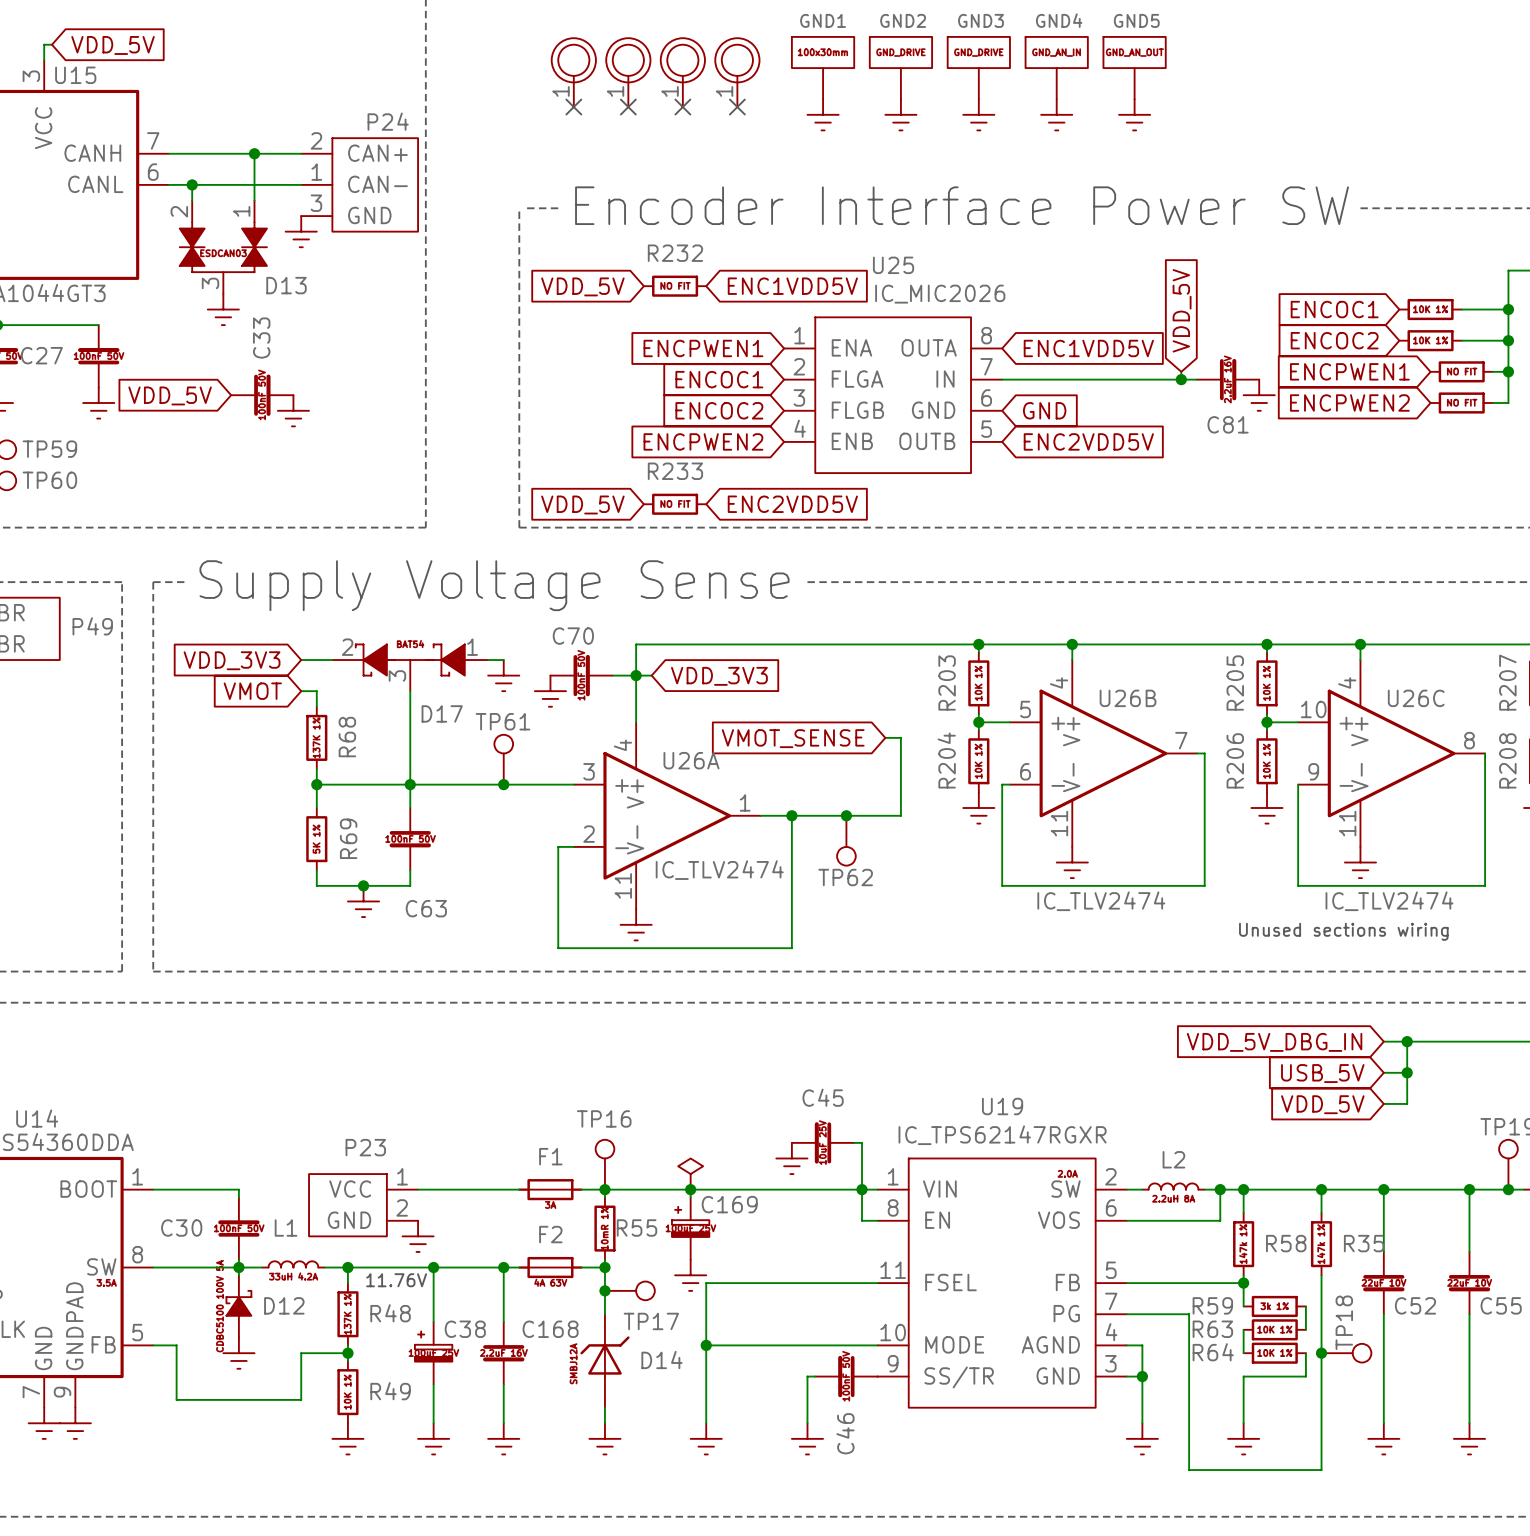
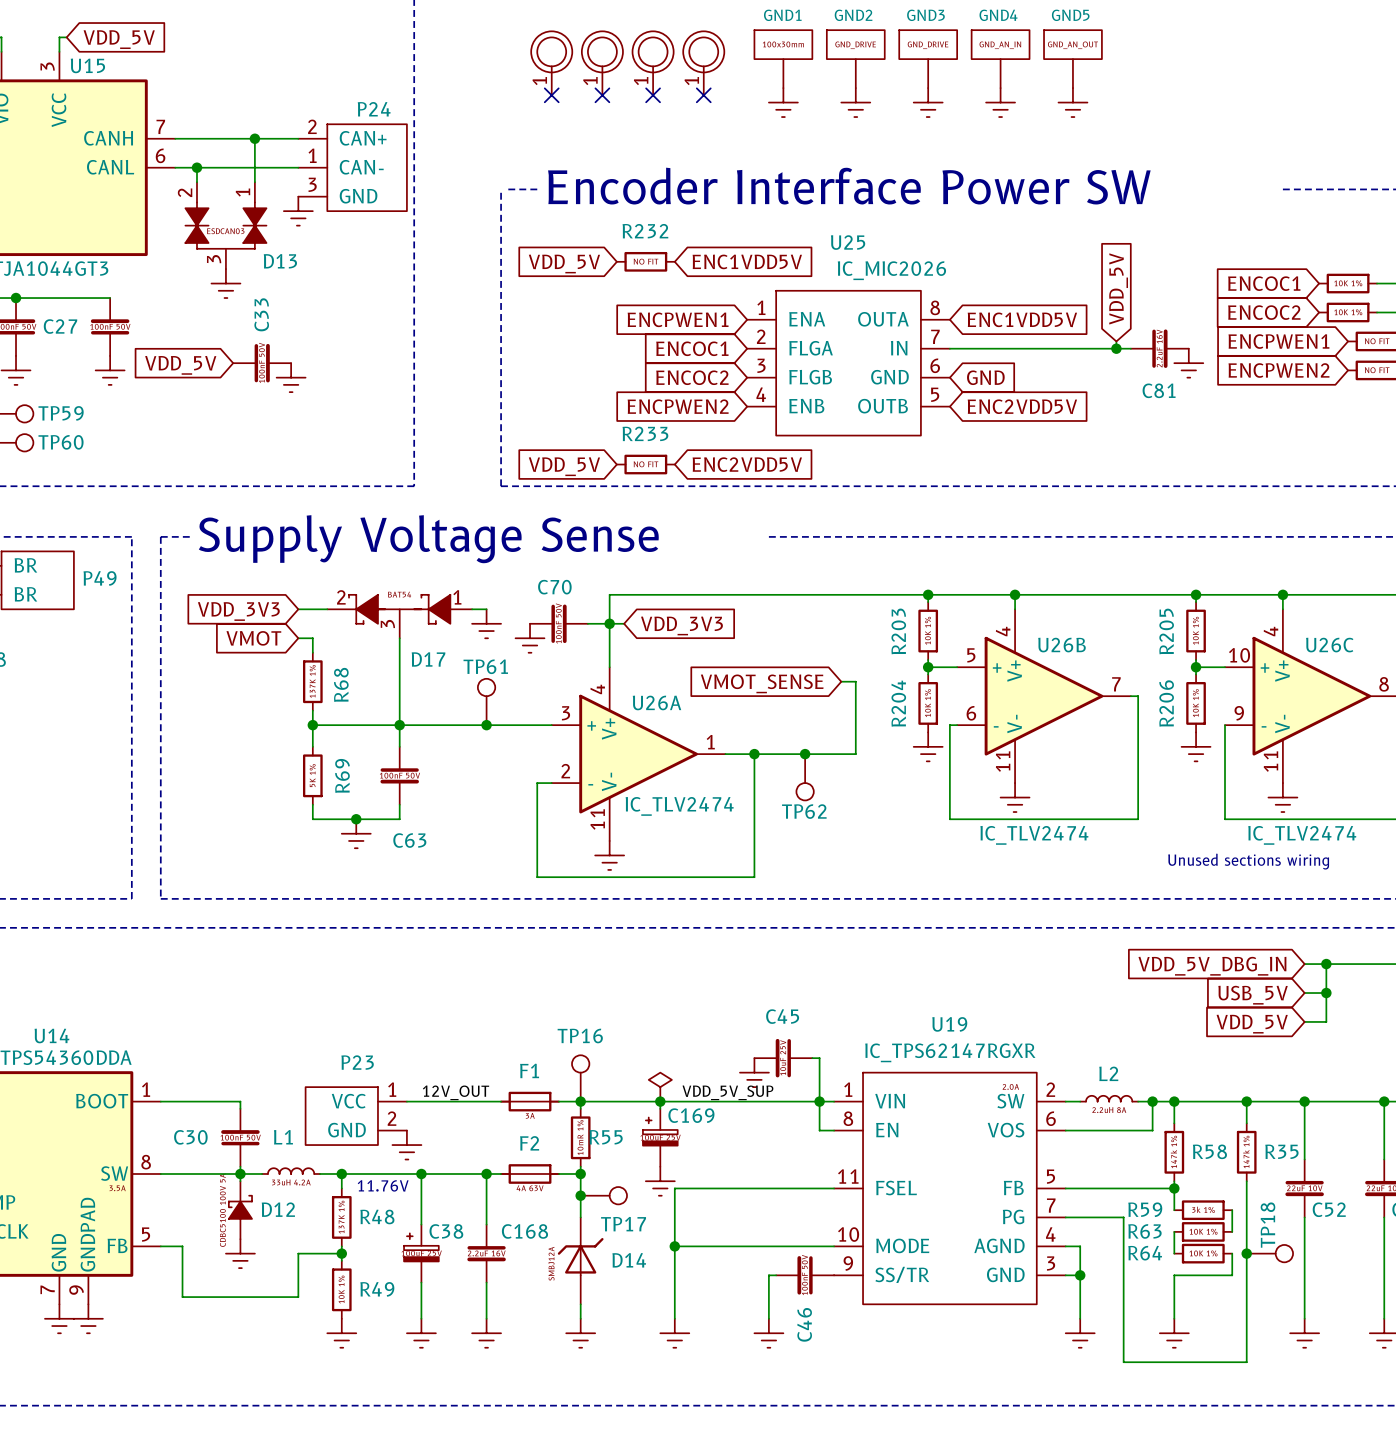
label: none -> 12V_OUT (456, 1092)
label: none -> VDD_5V_SUP (727, 1092)

